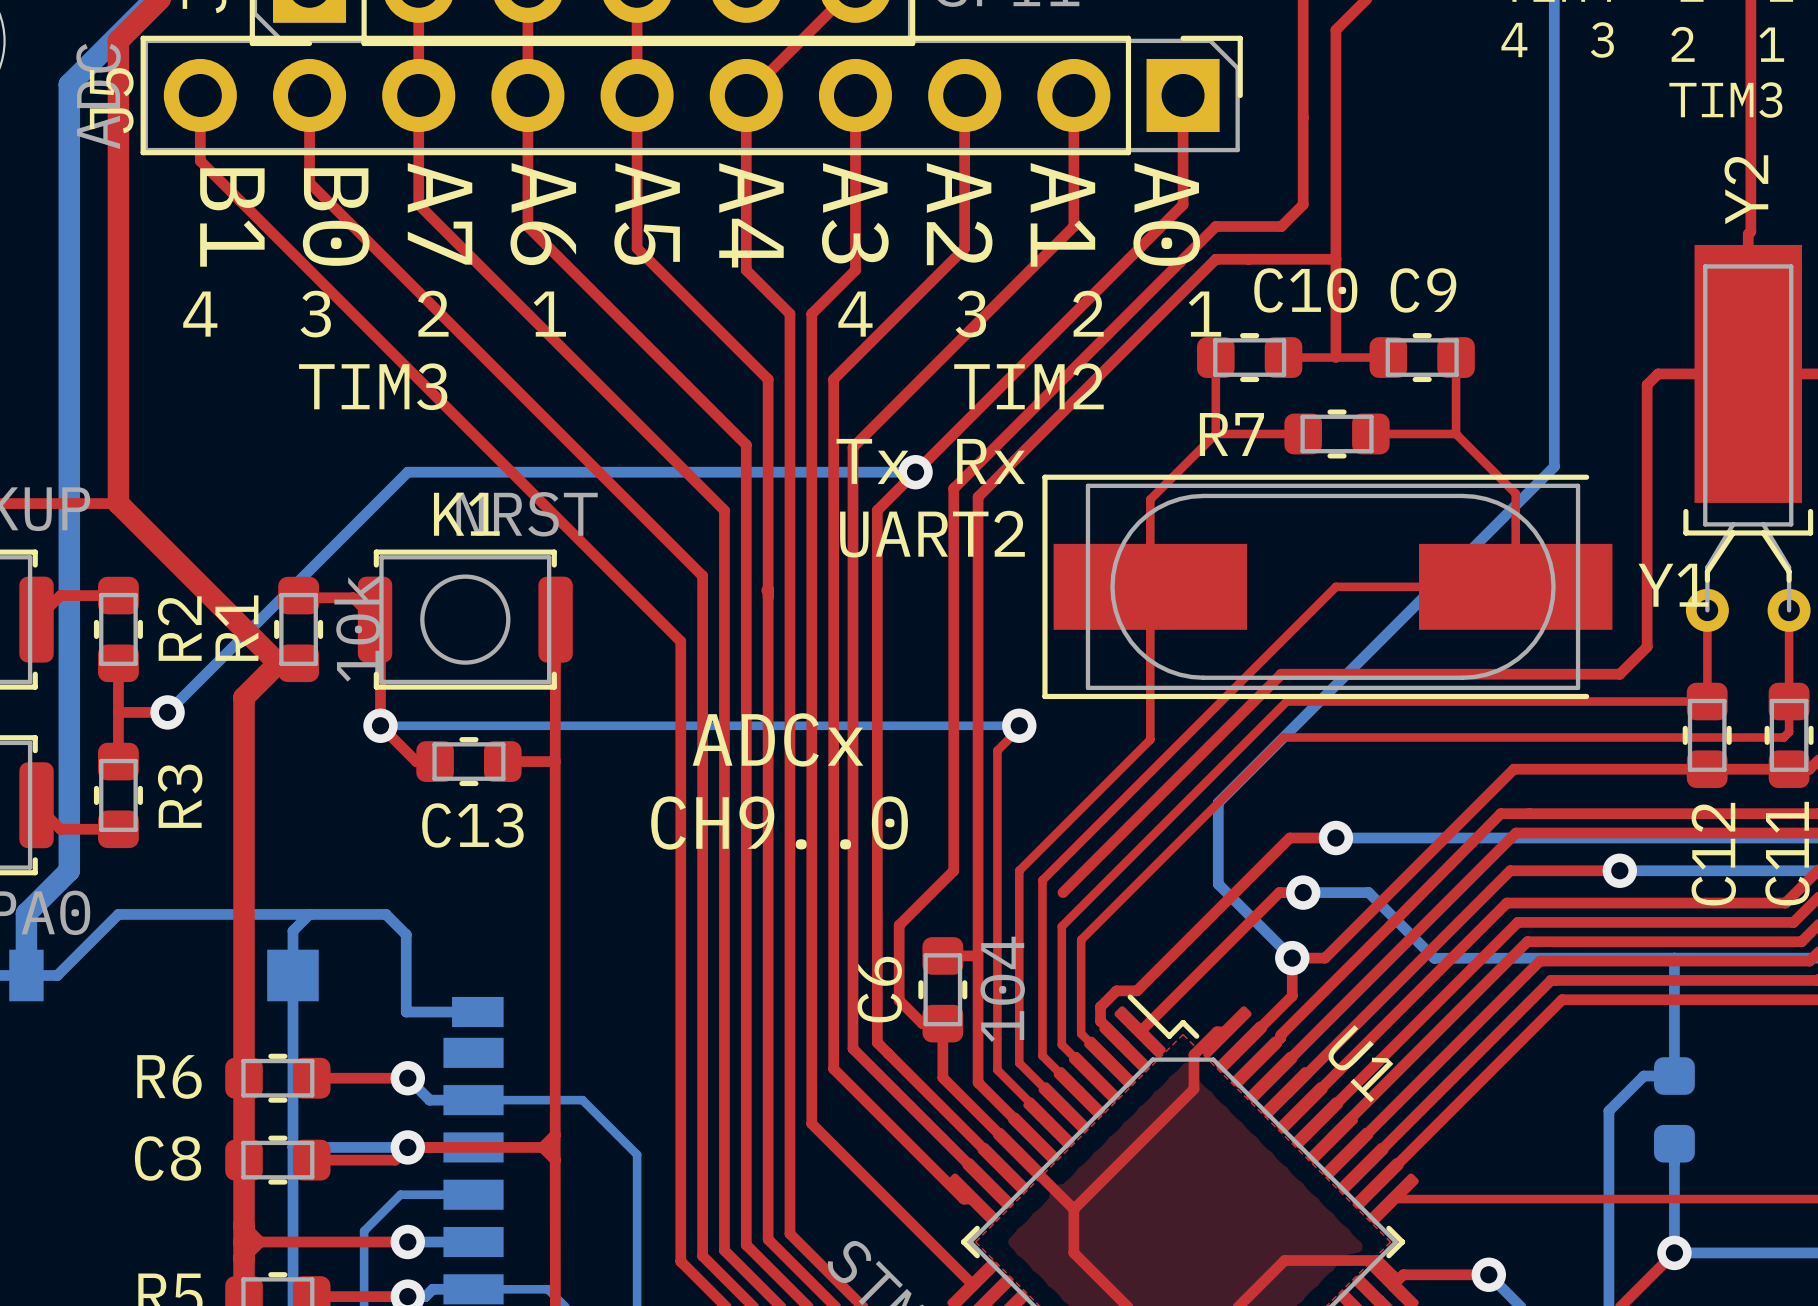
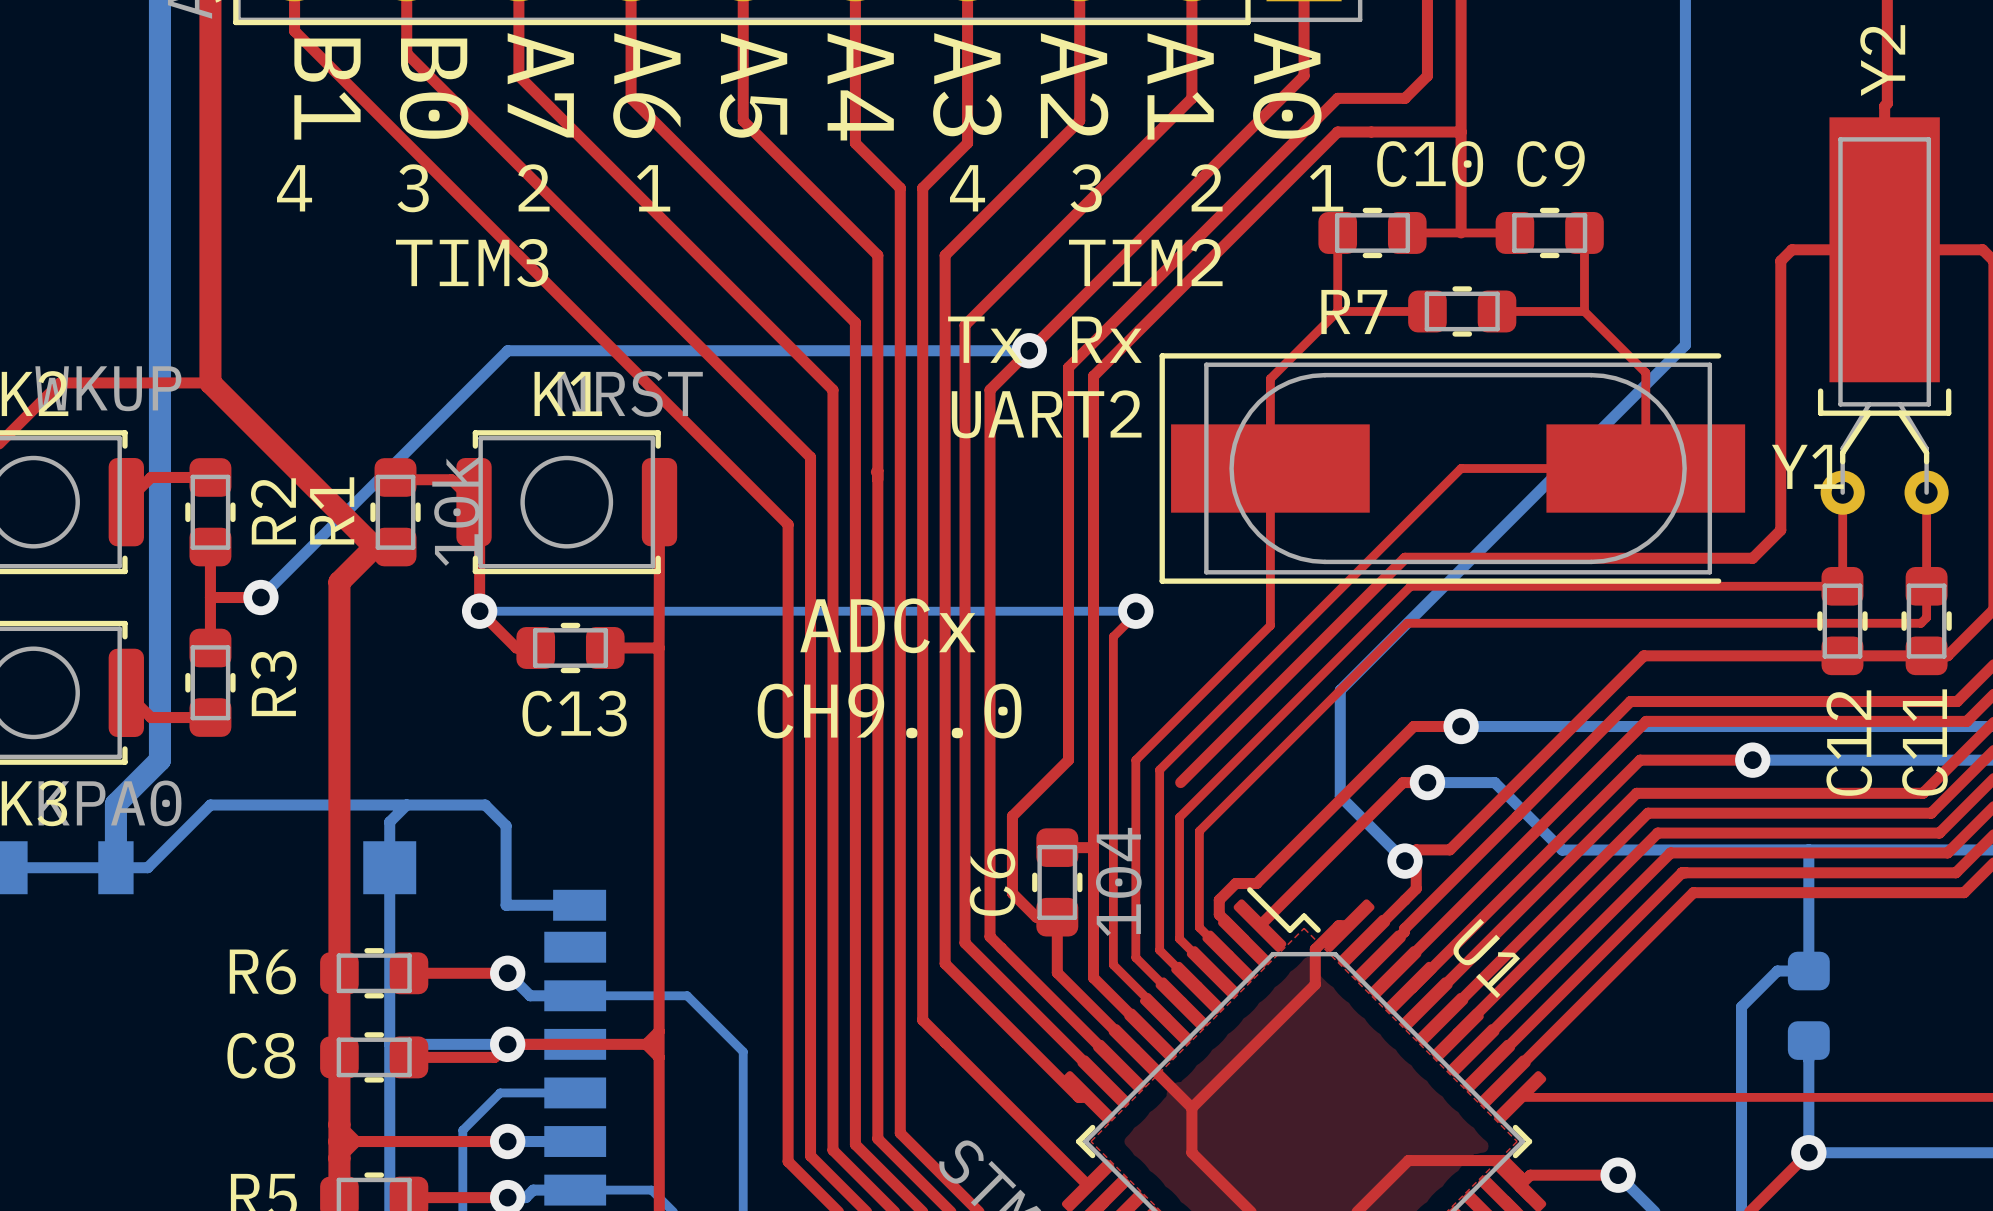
bottom track: (1218, 884) (1292, 958) -> (1340, 773) (1340, 796) (1405, 861)
via position: (1292, 958) -> (1405, 861)

